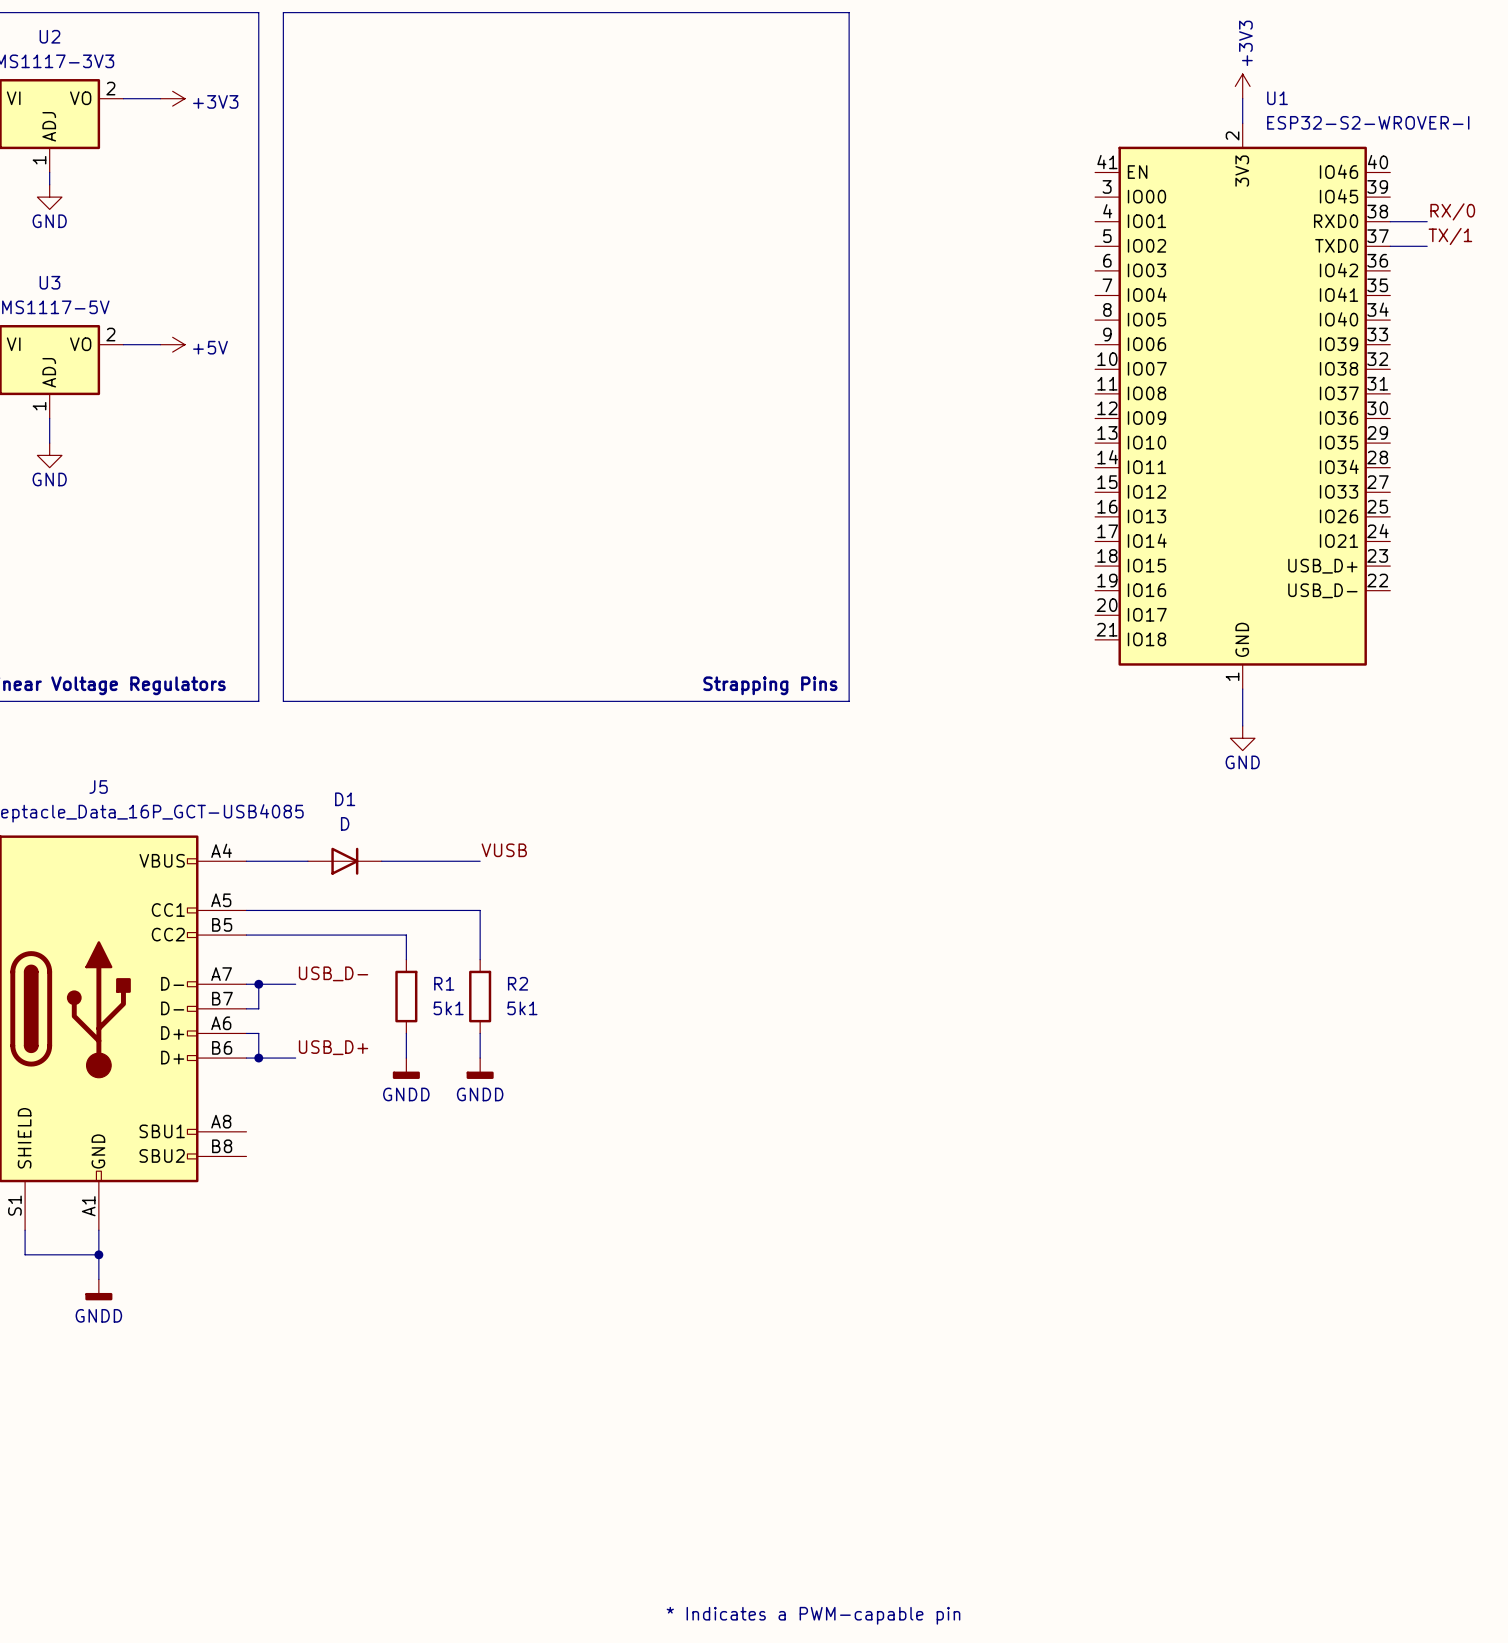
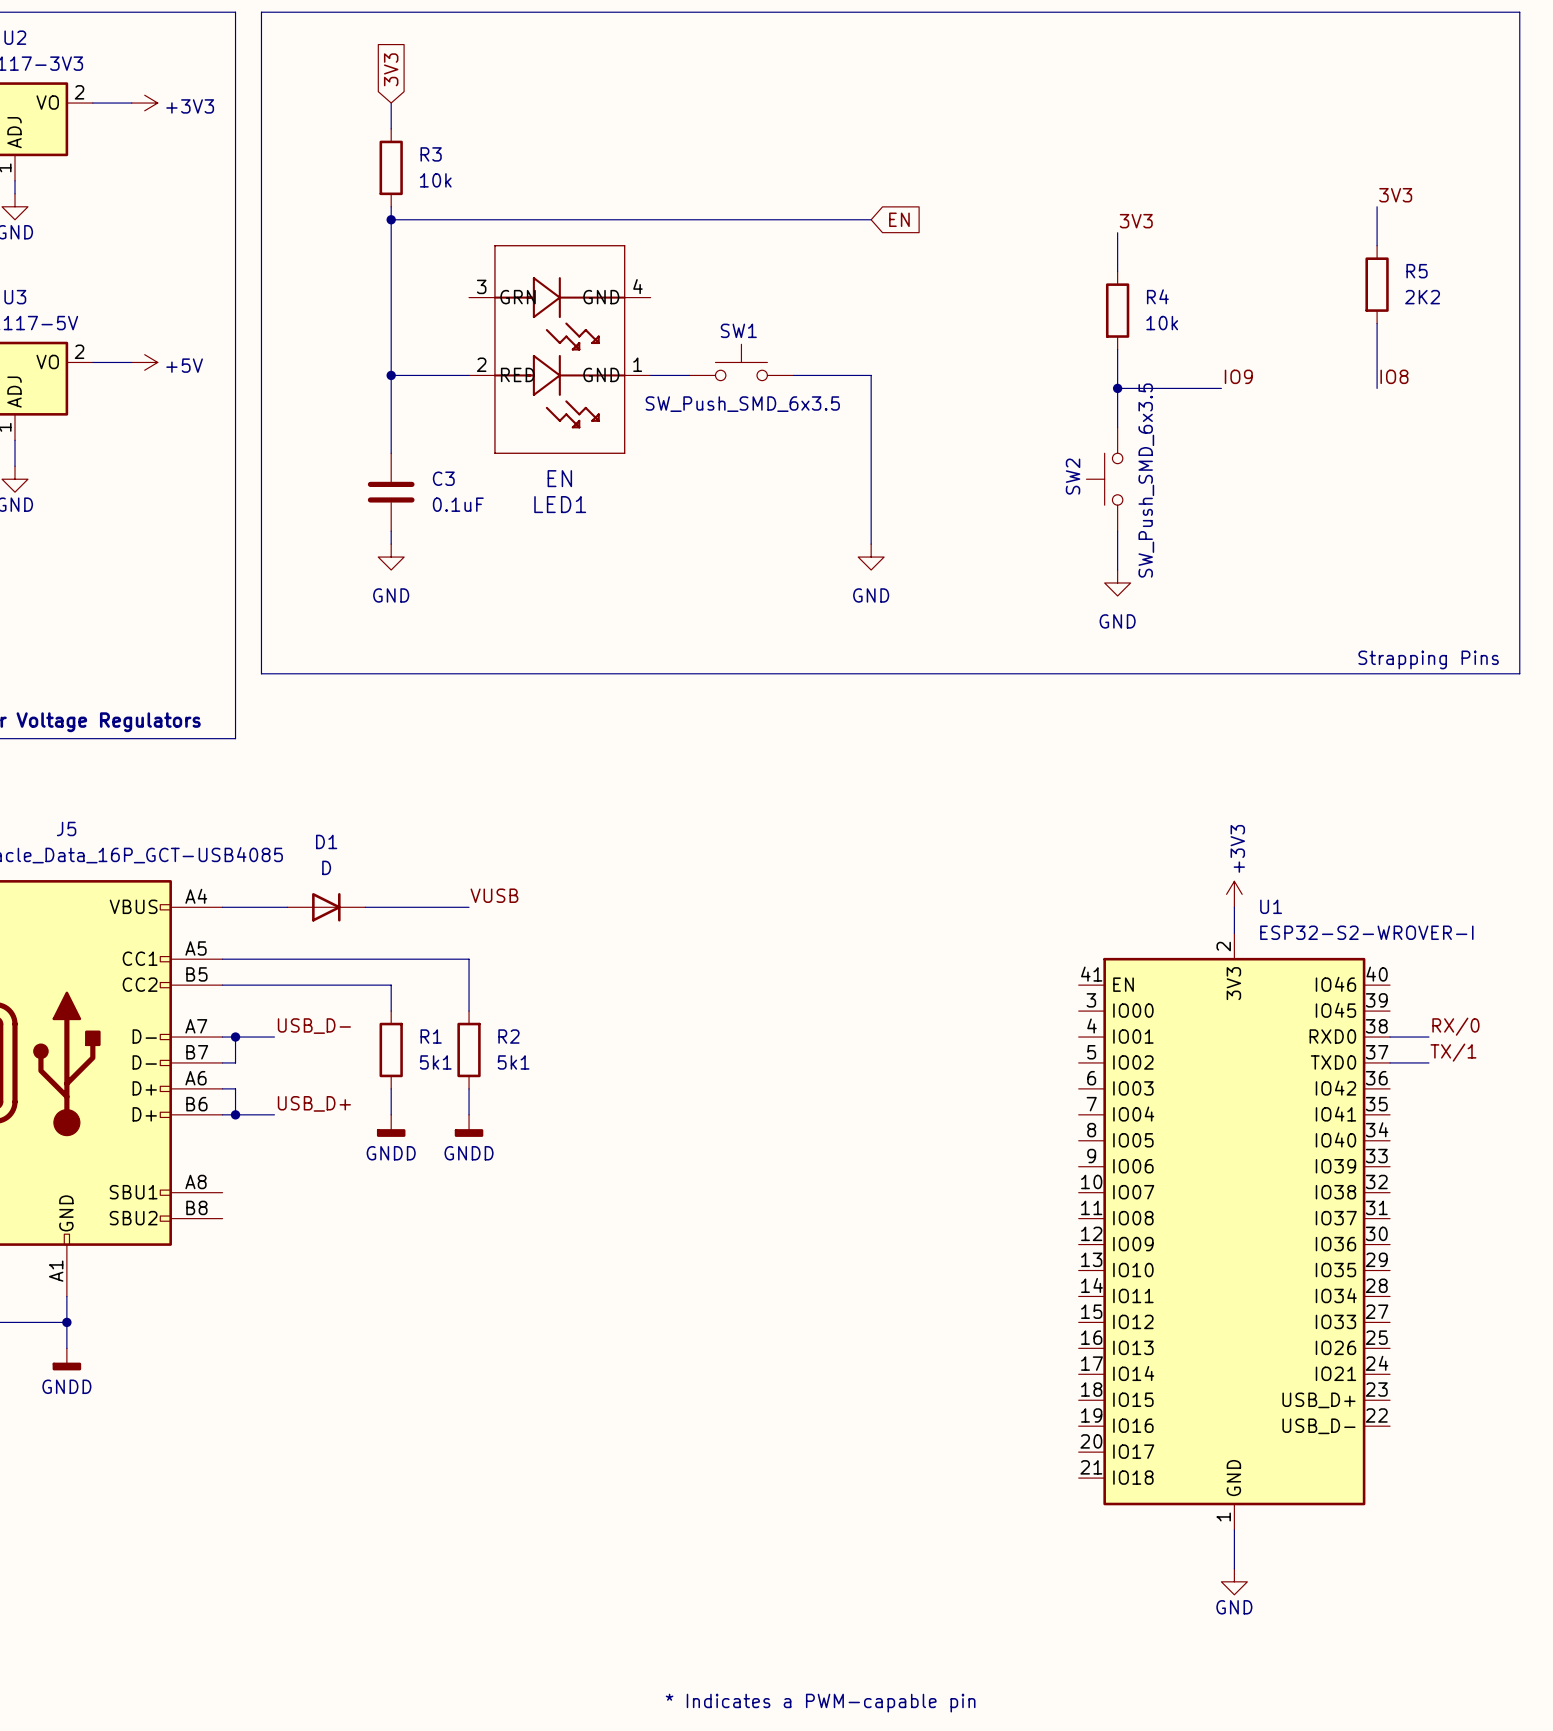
line: (849, 12) (849, 701) (283, 701) (283, 639) -> (858, 12) (1519, 12) (1519, 673) (261, 673)
global label: none -> 3V3 (391, 69)
power symbol: +3V3 (1242, 86) -> none
wire: none -> (391, 103) (391, 128)
wire: (1242, 98) (1242, 123) -> none
R3: none -> 10k (391, 167)
label: none -> 3V3 (1395, 195)
wire: none -> (391, 206) (391, 453)
wire: none -> (391, 219) (871, 219)
junction: none -> (391, 219)
global label: none -> EN (899, 219)
label: none -> 3V3 (1136, 221)
label: RX/0 (1452, 211) -> none
wire: none -> (1117, 232) (1117, 271)
wire: (1390, 221) (1427, 221) -> none
label: TX/1 (1450, 236) -> none
wire: (1390, 246) (1427, 246) -> none
R5: none -> 2K2 (1377, 284)
R4: none -> 10k (1117, 310)
LED1: none -> EN (559, 349)
wire: none -> (1117, 349) (1117, 427)
SW1: none -> SW_Push_SMD_6x3.5 (741, 362)
wire: none -> (391, 375) (469, 375)
junction: none -> (391, 375)
wire: none -> (650, 375) (689, 375)
wire: none -> (793, 375) (871, 375) (871, 544)
label: none -> IO9 (1238, 376)
label: none -> IO8 (1394, 376)
junction: none -> (1117, 388)
U1 position: (1242, 406) -> (1234, 1231)
SW2: none -> SW_Push_SMD_6x3.5 (1104, 479)
C3: none -> 0.1uF (391, 492)
wire: none -> (391, 531) (391, 544)
power symbol: none -> GND (391, 557)
power symbol: none -> GND (871, 557)
power symbol: none -> GND (1117, 582)
text: none -> Strapping Pins (1428, 659)
text: Strapping Pins (770, 685) -> none
wire: (1242, 689) (1242, 725) -> (1117, 531) (1117, 570)
power symbol: GND (1242, 738) -> none
power symbol: none -> +3V3 (1234, 894)
wire: none -> (1234, 907) (1234, 933)
label: none -> RX/0 (1455, 1026)
wire: none -> (1390, 1037) (1428, 1037)
label: none -> TX/1 (1453, 1052)
wire: none -> (1390, 1062) (1428, 1062)
wire: none -> (1234, 1529) (1234, 1568)
power symbol: none -> GND (1234, 1581)

